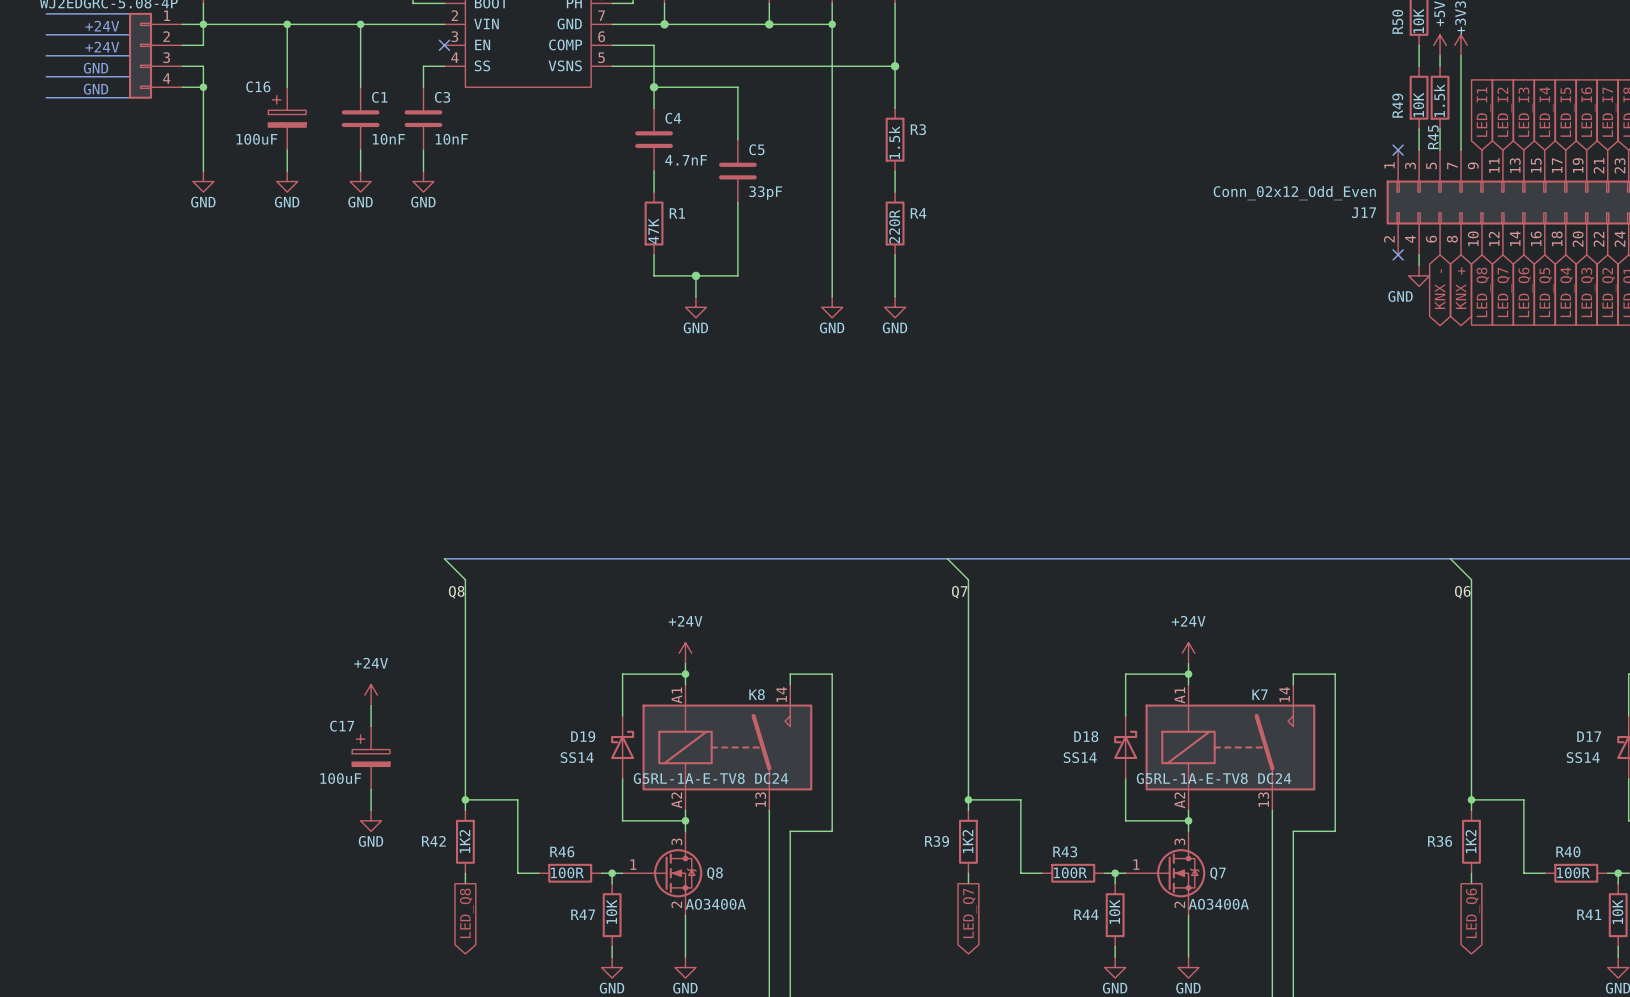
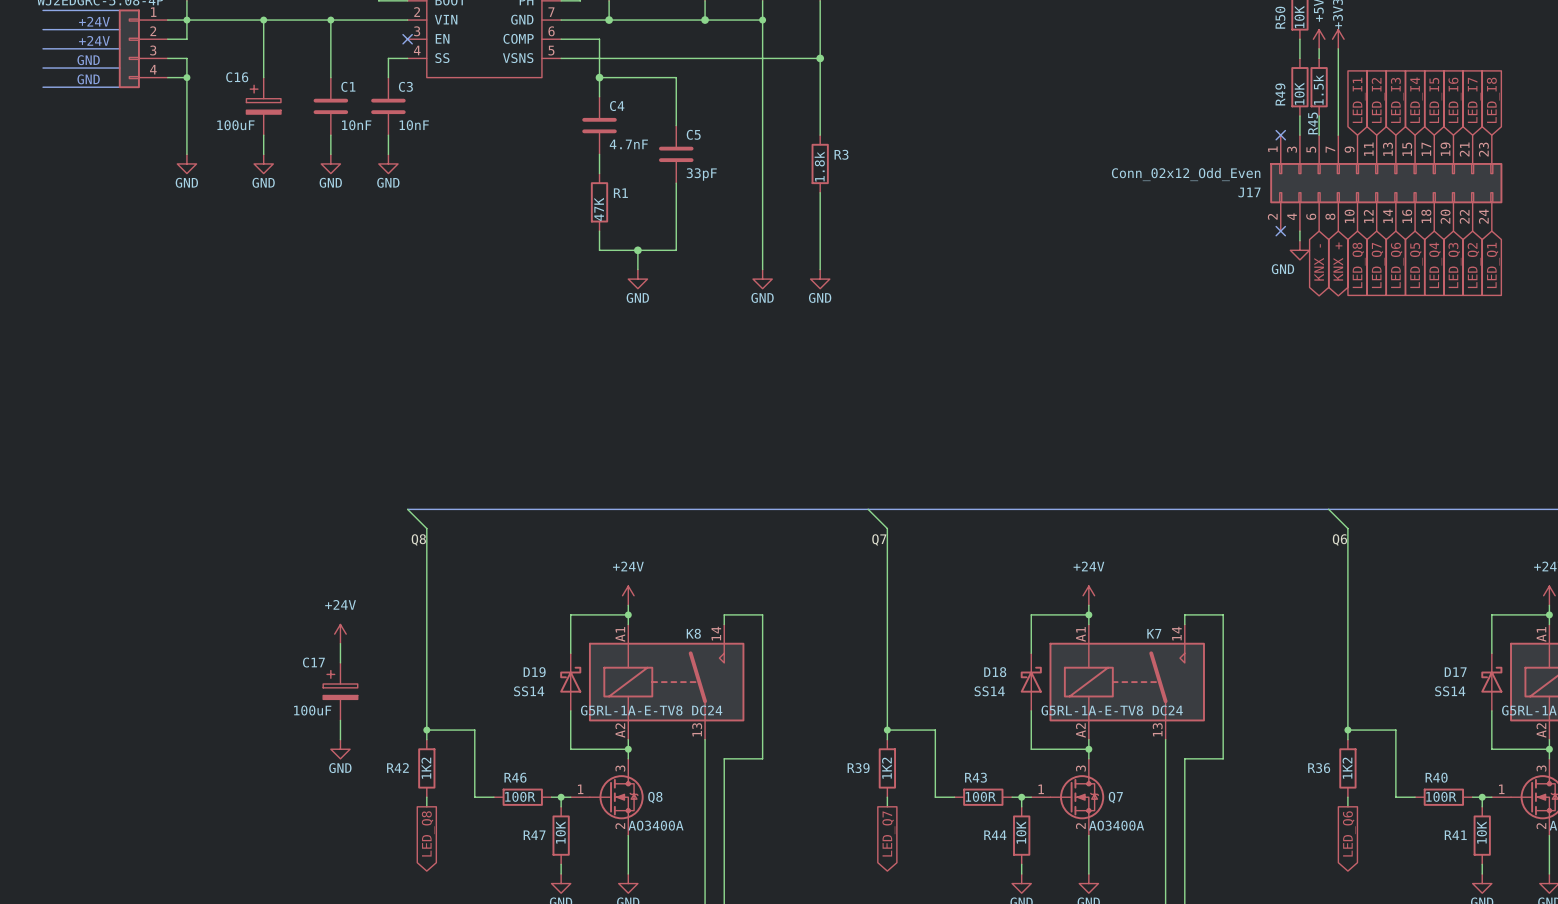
wire: none -> (820, 96) (820, 135)
R3 position: (895, 139) -> (820, 163)
R3 value: 1.5k (894, 142) -> 1.8k (819, 166)
wire: (895, 171) (895, 192) -> none
R4: 220R (895, 223) -> none

